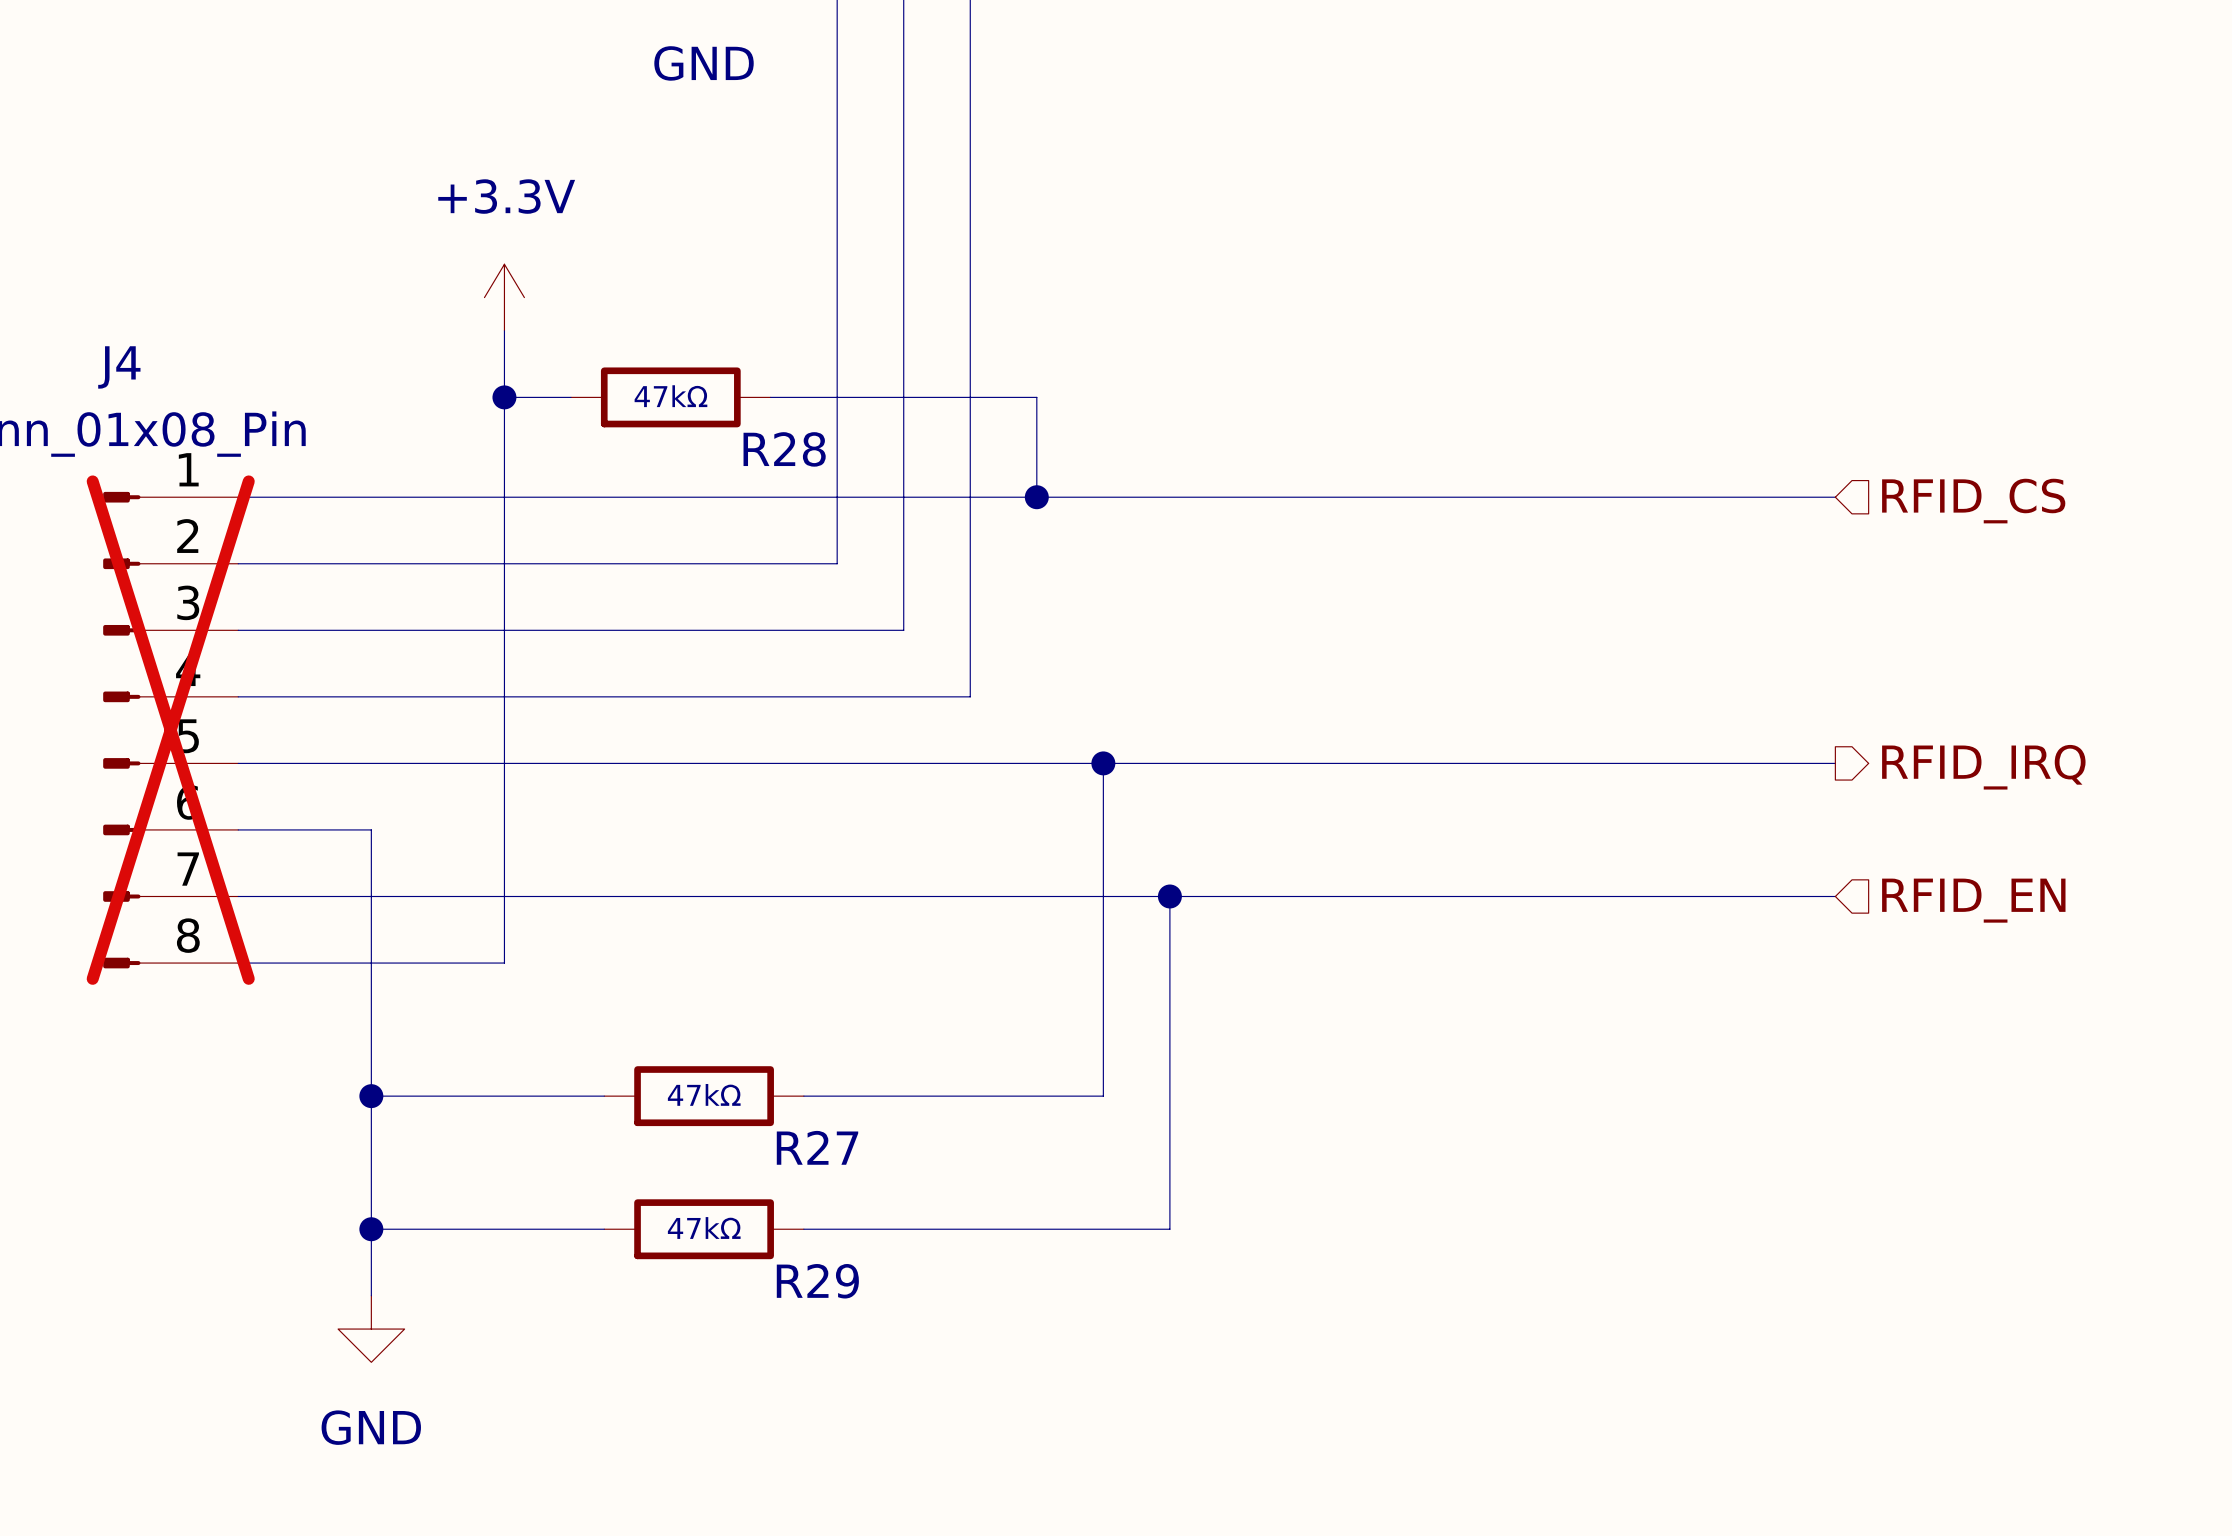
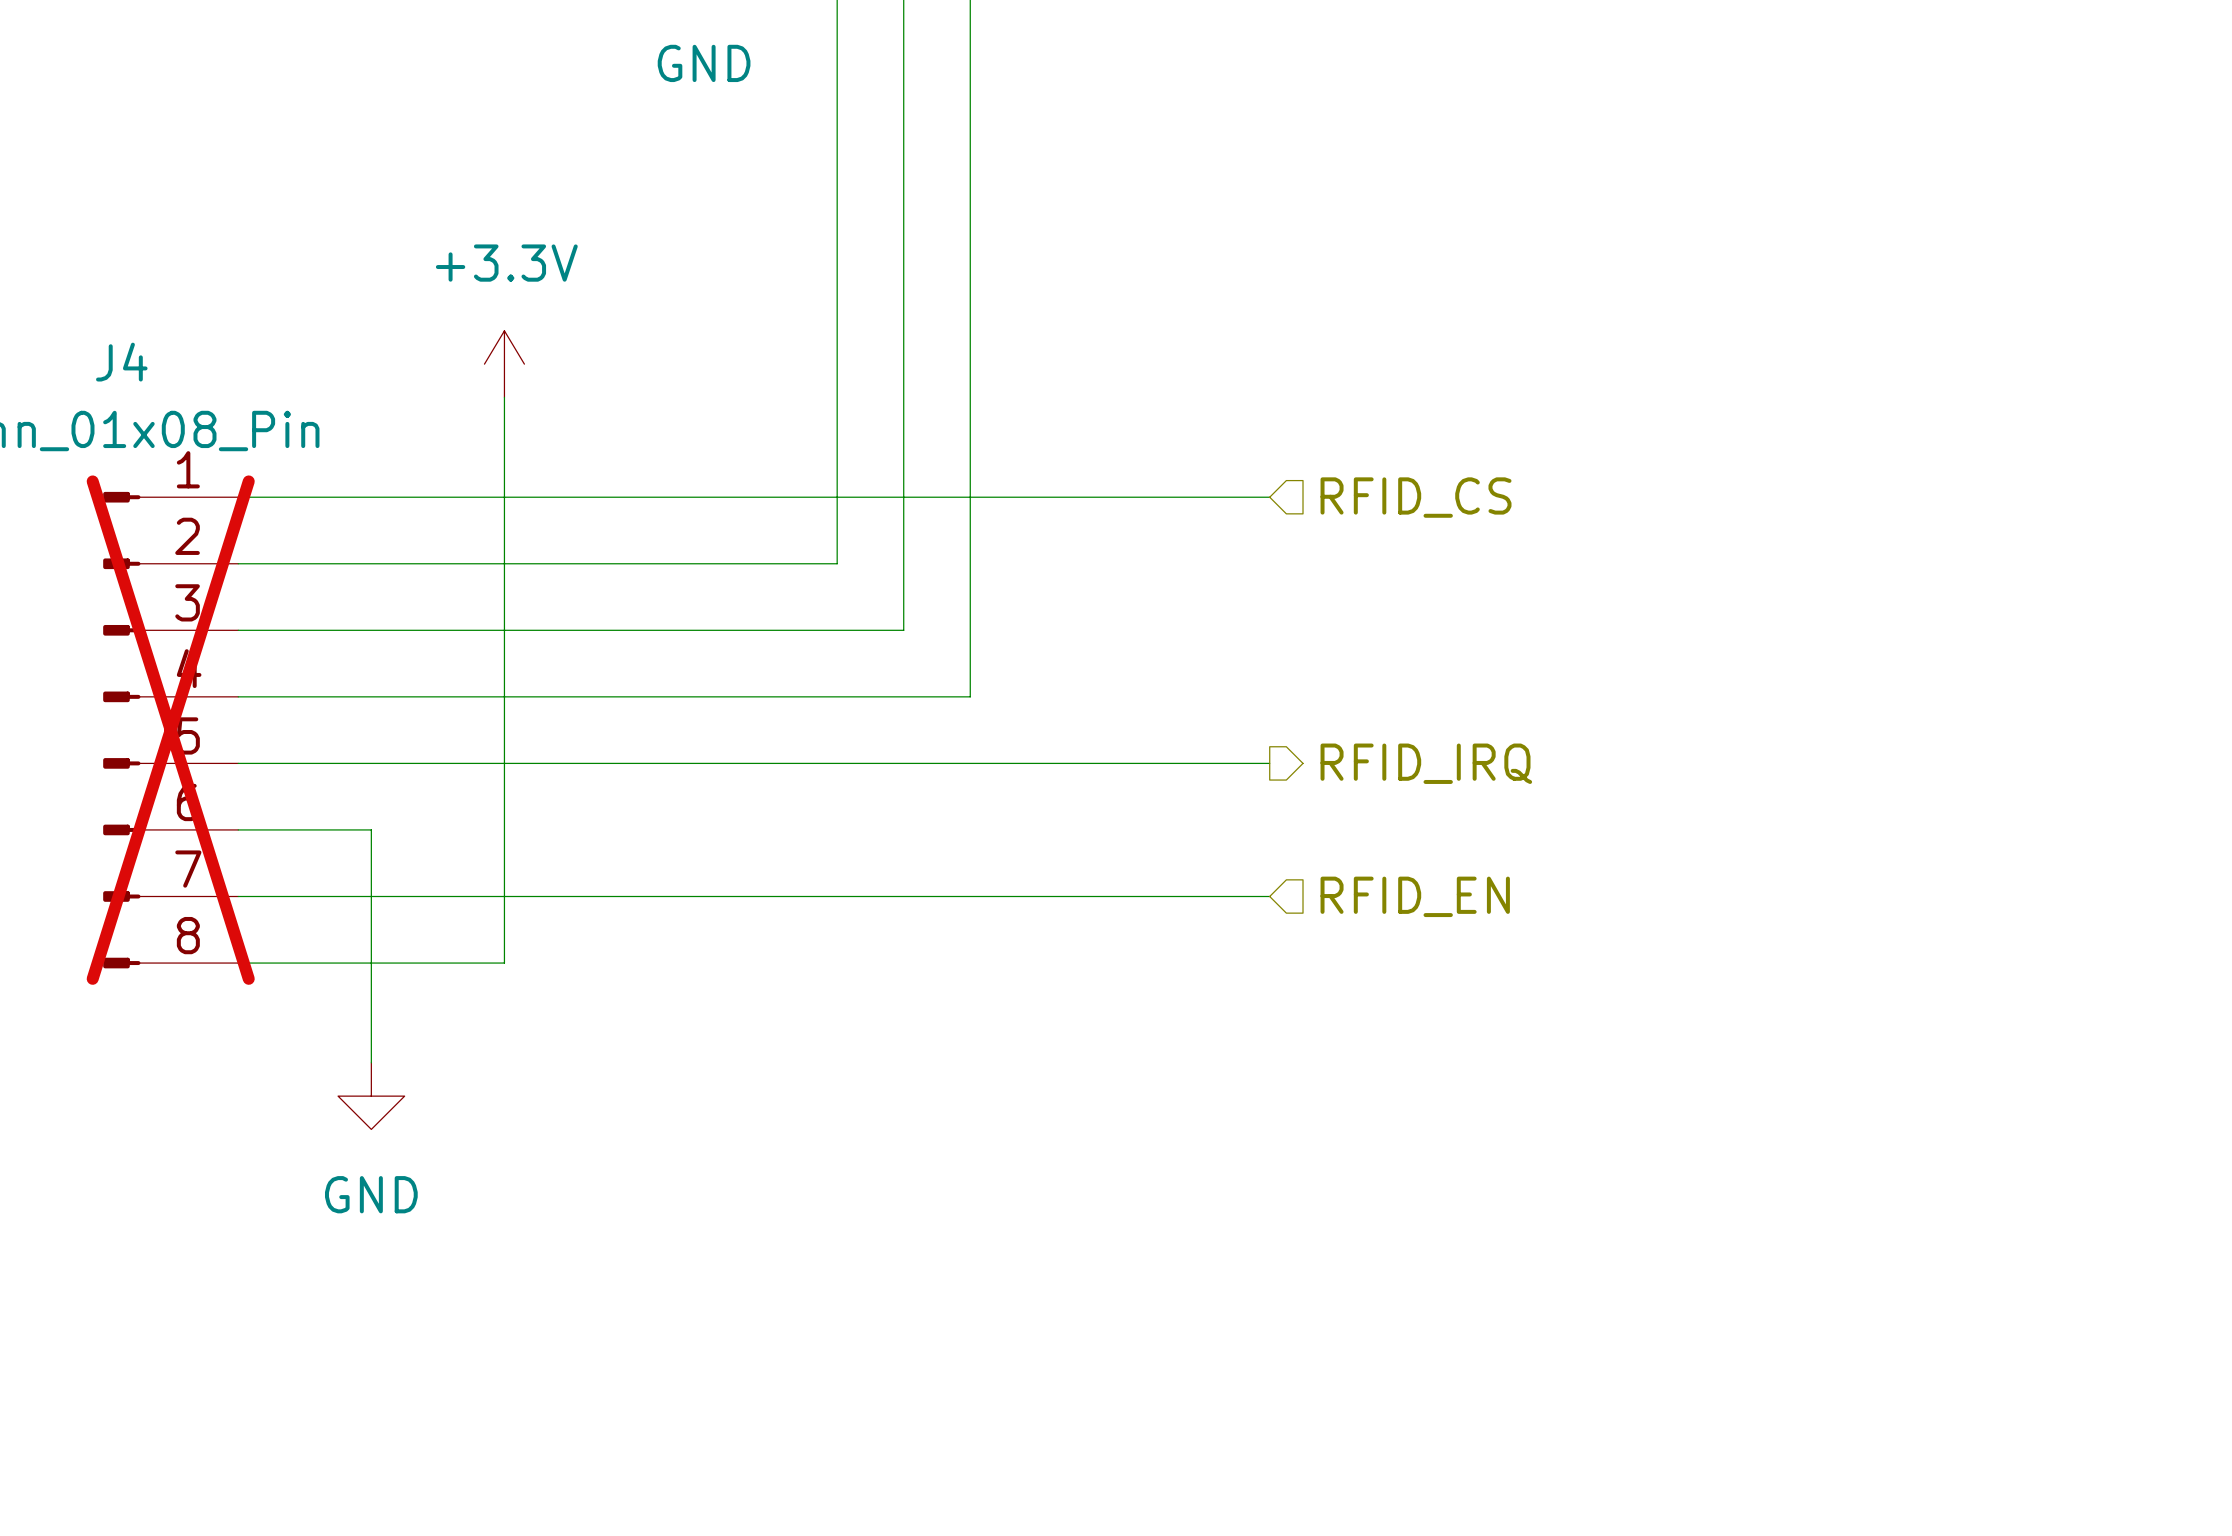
power symbol position: +3.3V (504, 297) -> +3.3V (504, 364)
wire: (504, 330) (504, 397) (570, 397) -> none
junction: (504, 397) -> none
R28: 47kΩ (670, 397) -> none
wire: (770, 397) (1036, 397) (1036, 497) -> none
junction: (1036, 497) -> none
wire: (1269, 497) (1835, 497) -> none
hierarchical label position: RFID_CS (1973, 501) -> RFID_CS (1416, 497)
wire: (1103, 763) (1103, 1096) (803, 1096) -> none
junction: (1103, 763) -> none
wire: (1269, 763) (1835, 763) -> none
hierarchical label position: RFID_IRQ (1983, 767) -> RFID_IRQ (1426, 763)
wire: (1169, 896) (1169, 1229) (803, 1229) -> none
junction: (1169, 896) -> none
wire: (1269, 896) (1835, 896) -> none
hierarchical label position: RFID_EN (1973, 900) -> RFID_EN (1415, 896)
wire: (371, 1062) (371, 1295) -> none
wire: (371, 1096) (604, 1096) -> none
junction: (371, 1096) -> none
R27: 47kΩ (704, 1096) -> none
wire: (371, 1229) (604, 1229) -> none
junction: (371, 1229) -> none
R29: 47kΩ (704, 1229) -> none
power symbol position: GND (371, 1329) -> GND (371, 1096)

